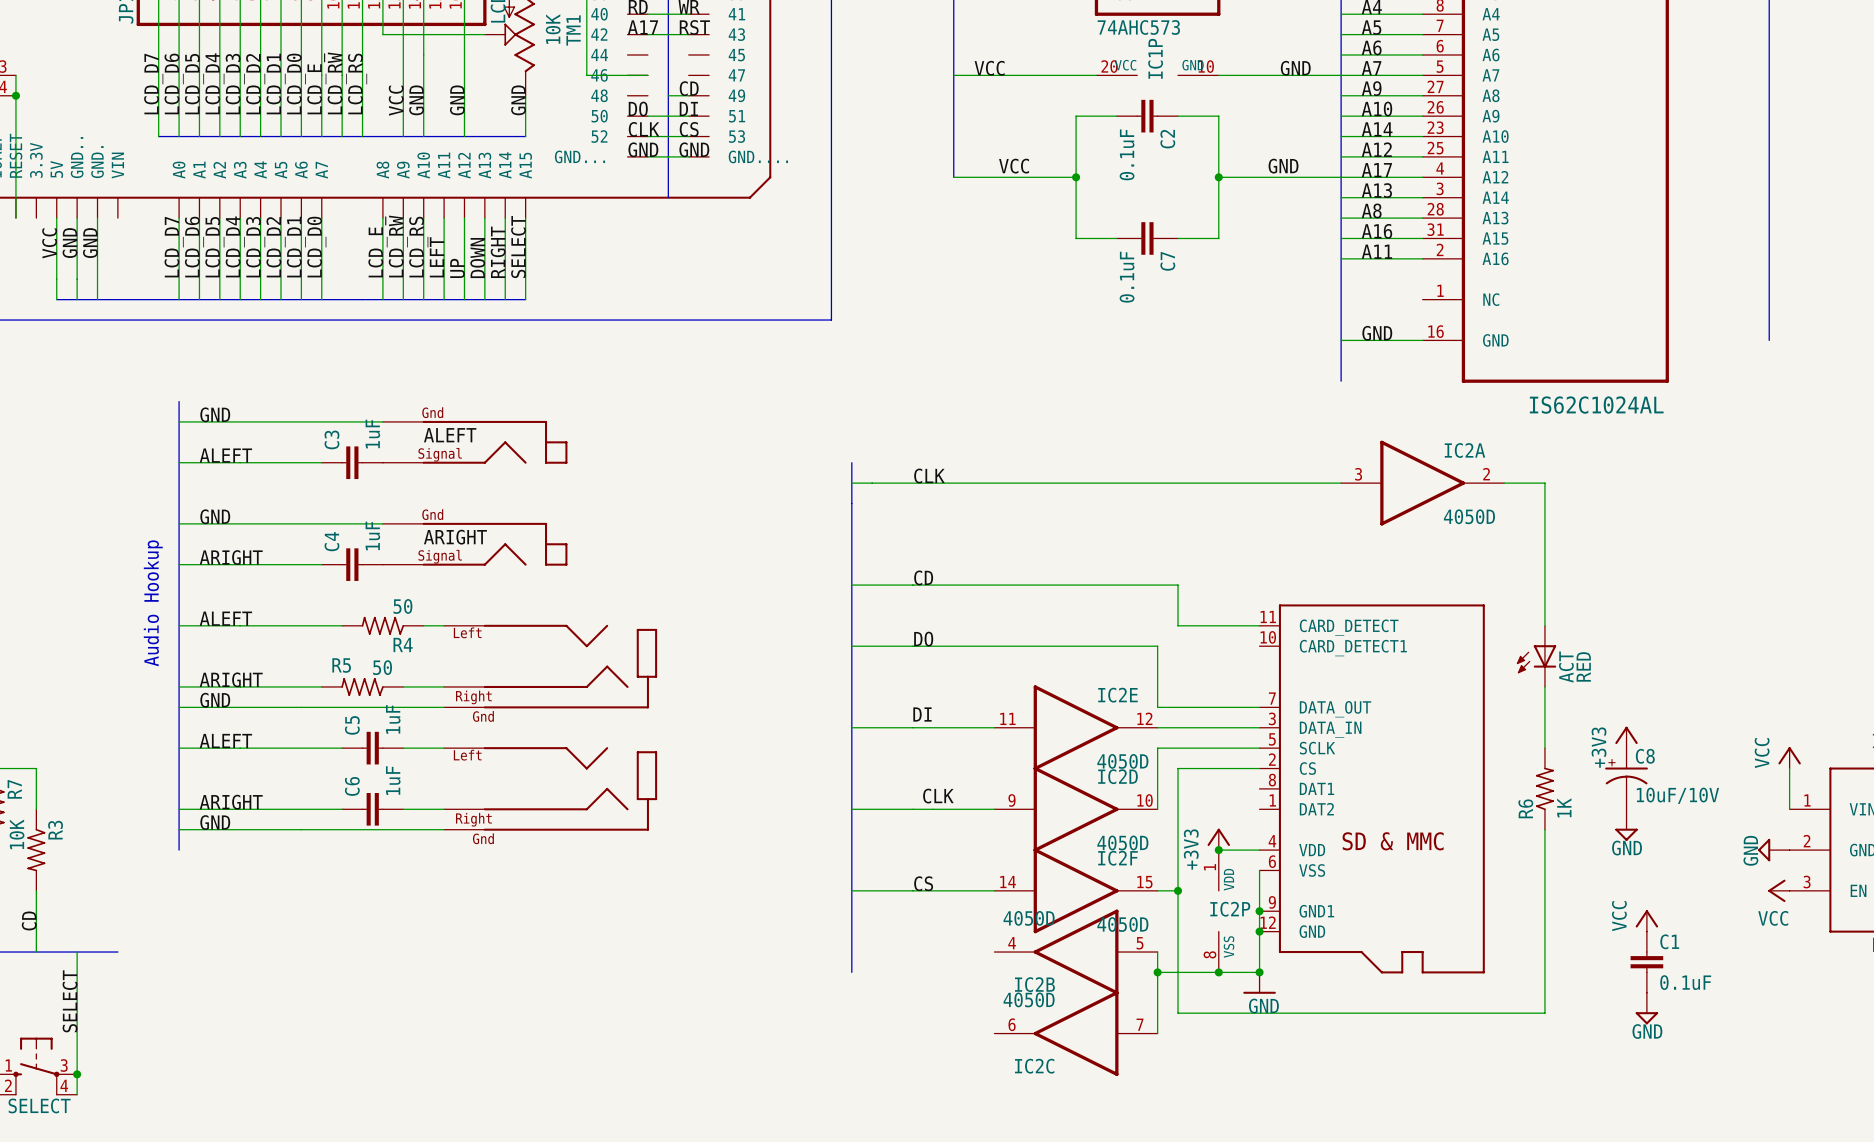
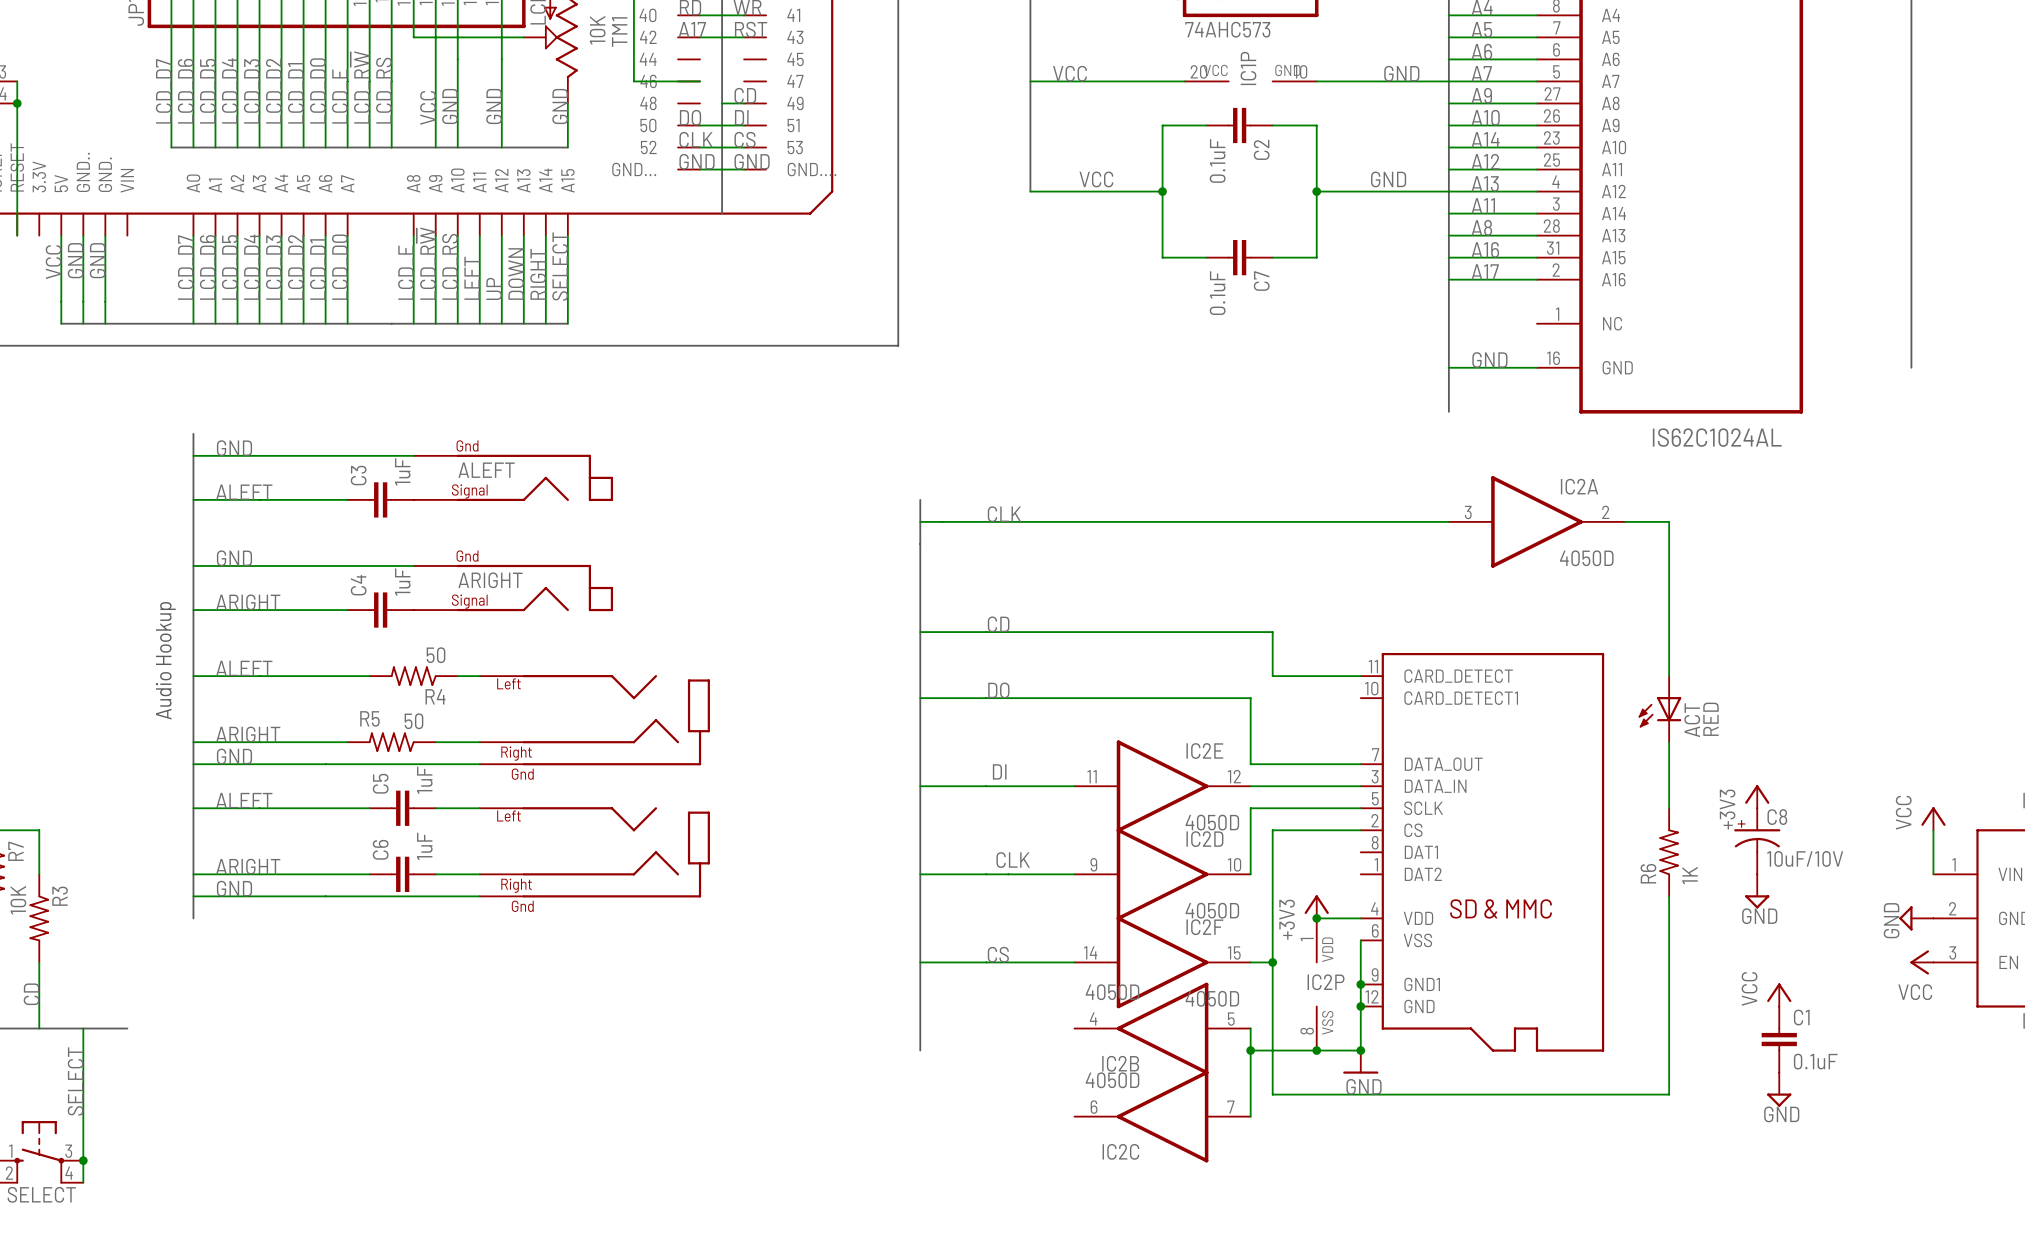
label: A17 (1376, 170) -> A13 (1485, 183)
label: A13 (1376, 190) -> A11 (1483, 205)
label: A11 (1376, 251) -> A17 (1485, 271)

